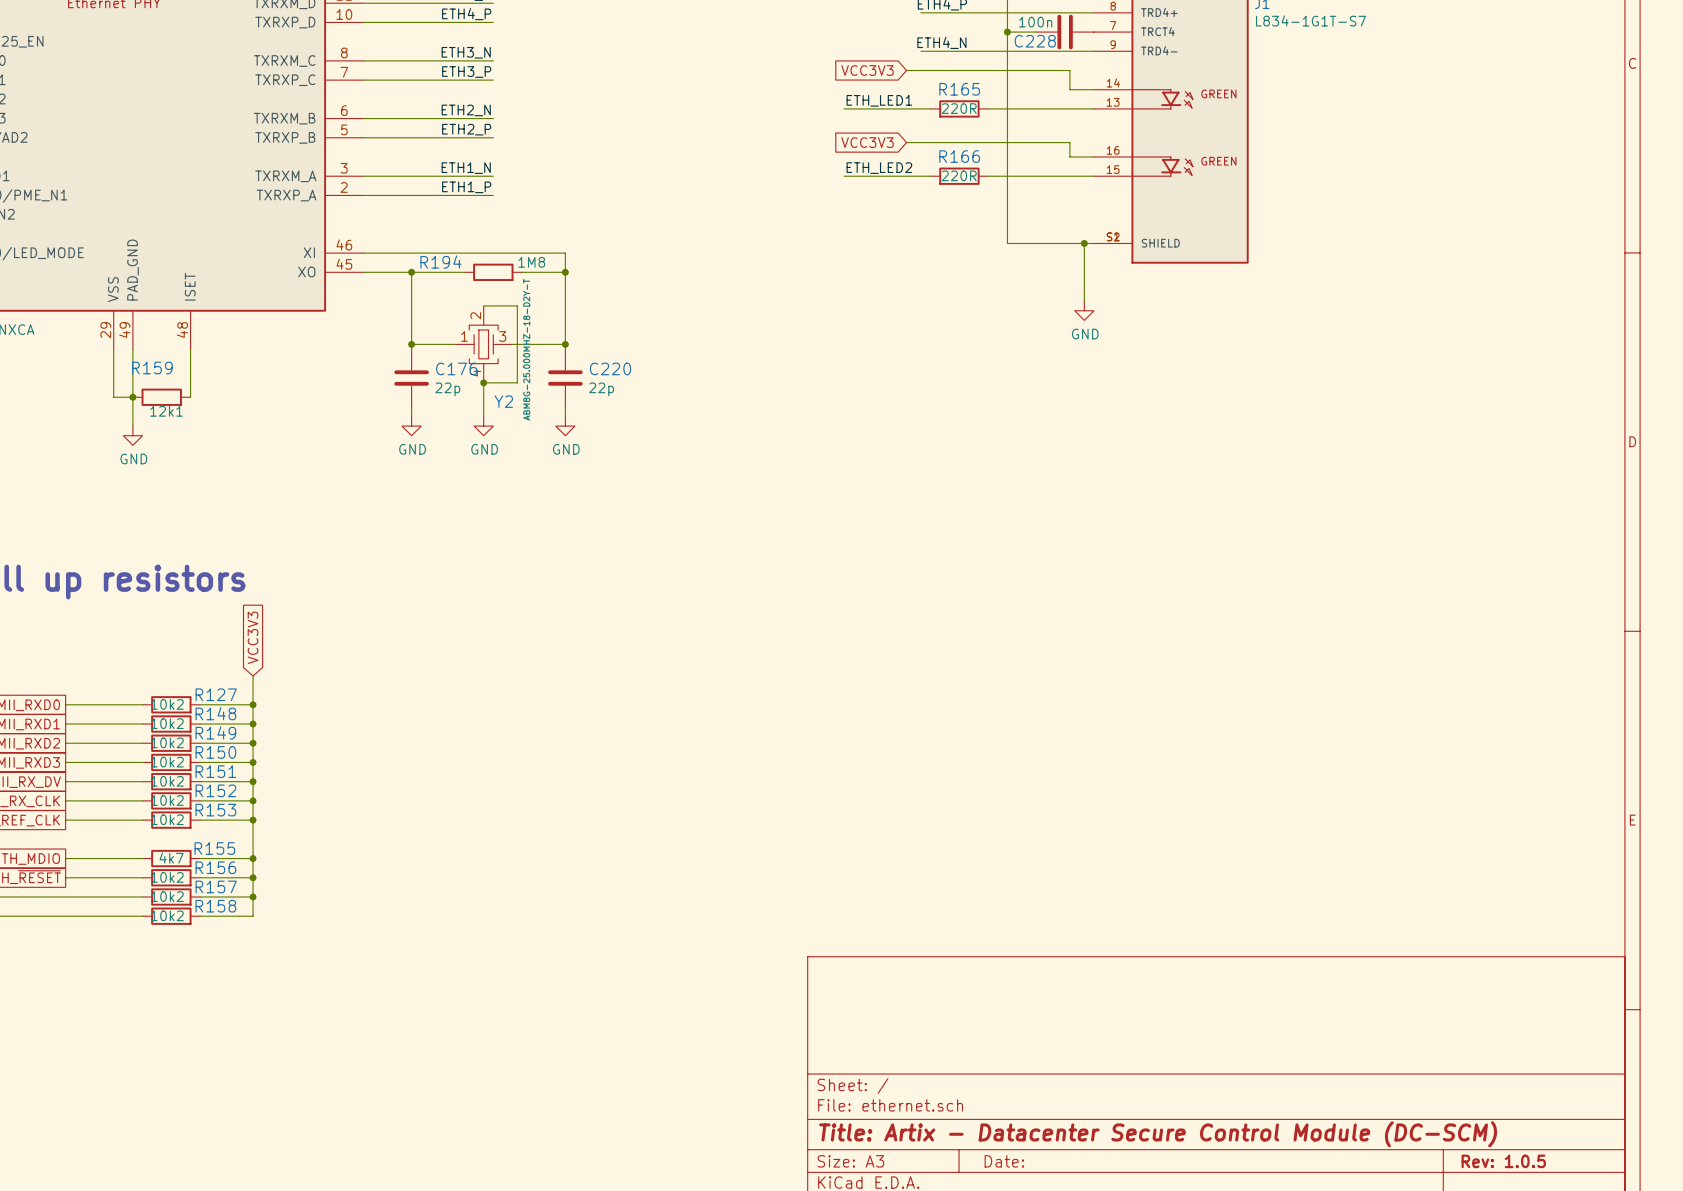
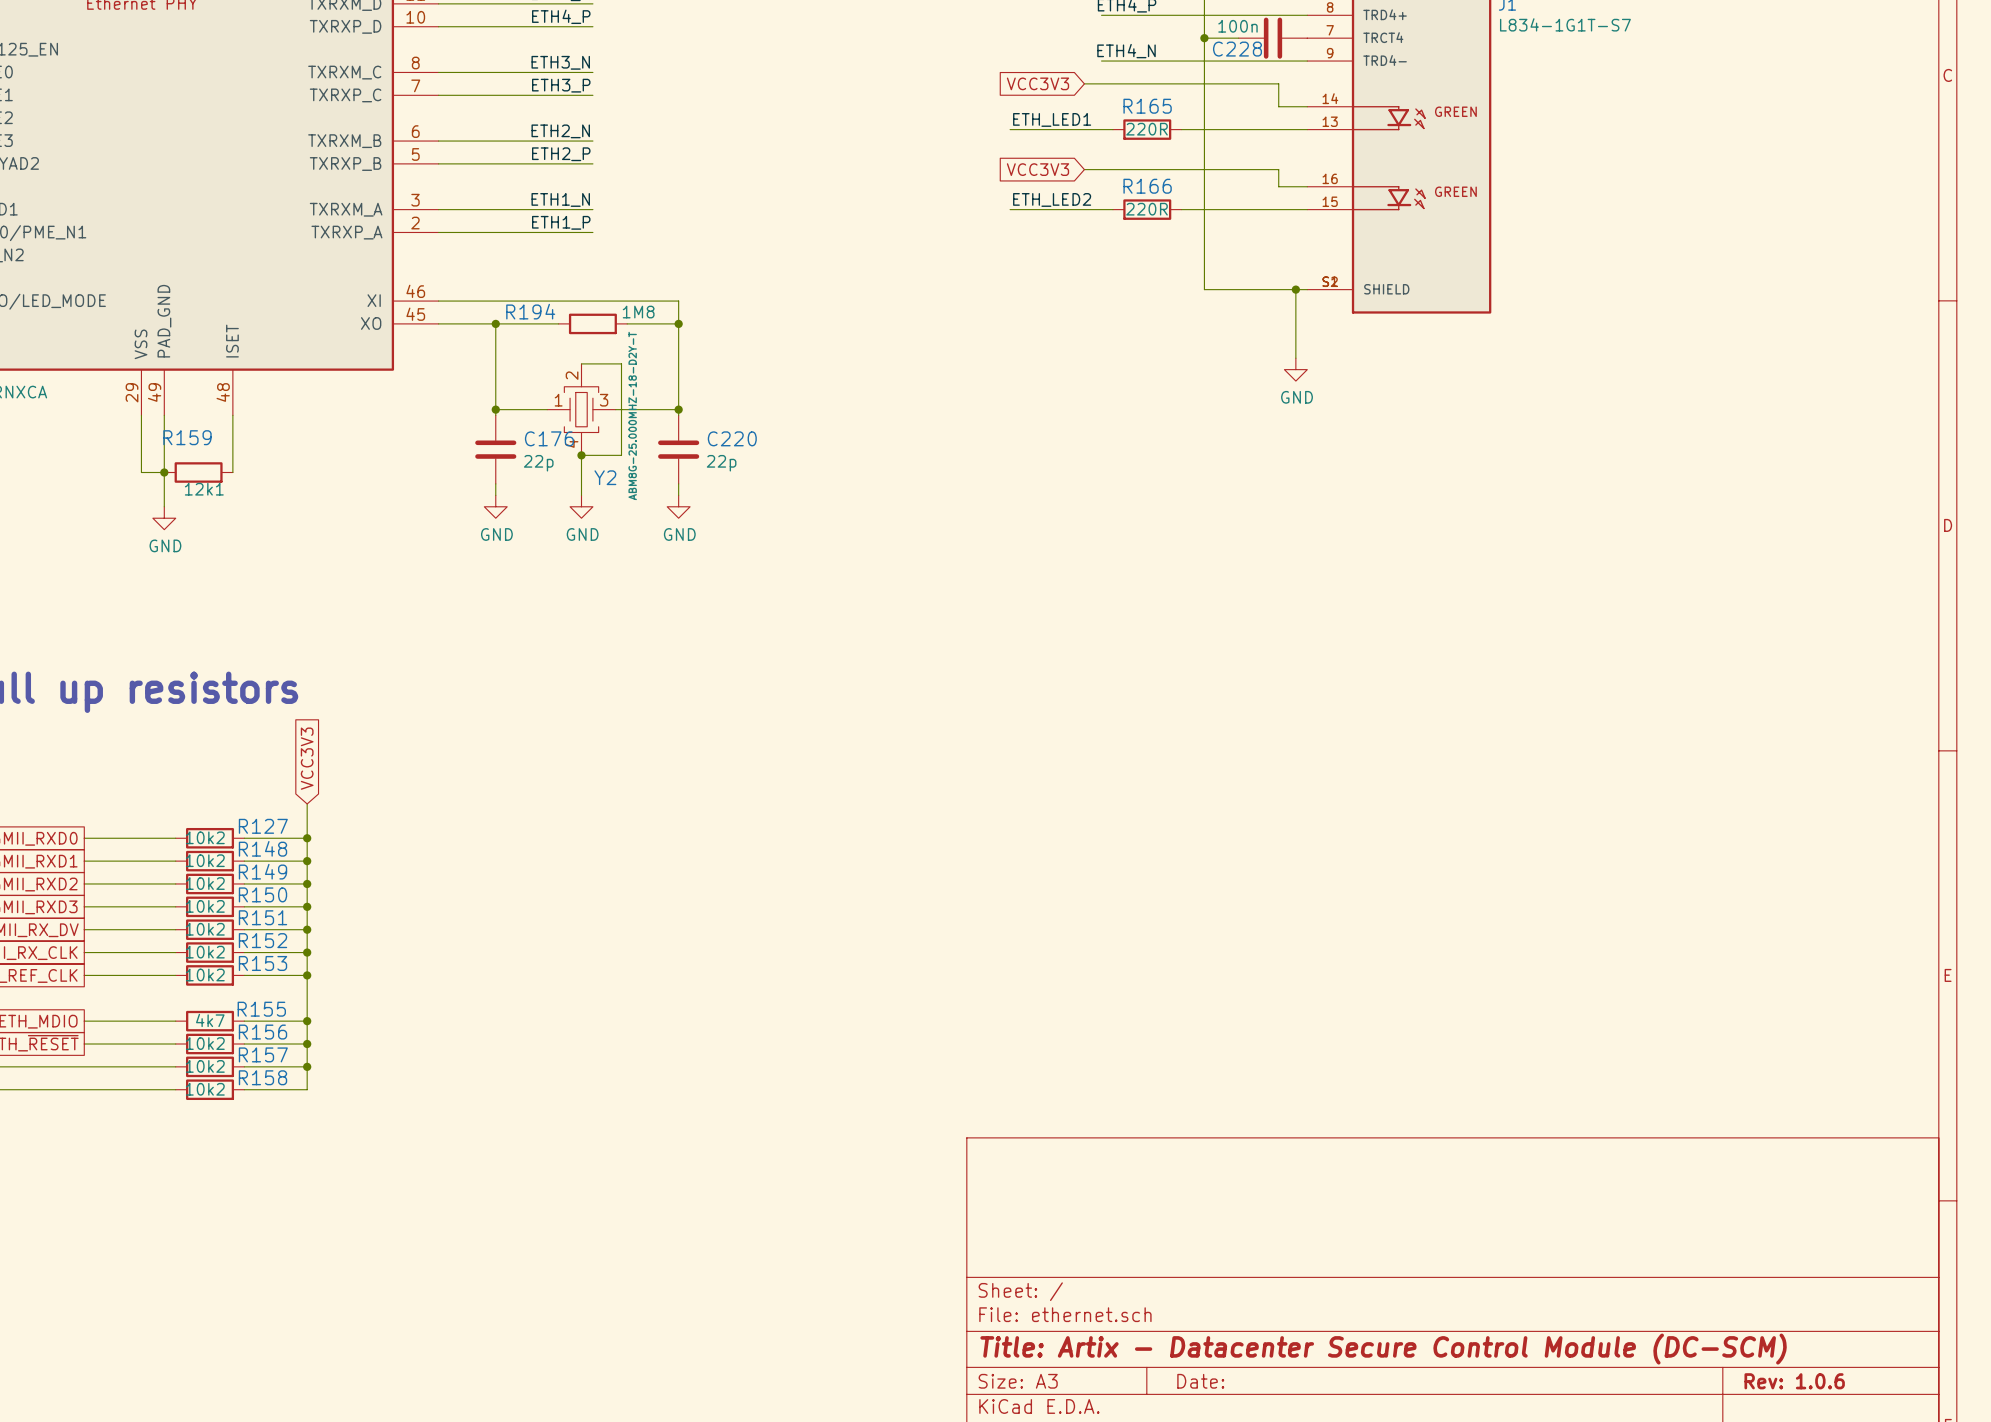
title block: Rev: 1.0.5 (1503, 1161) -> Rev: 1.0.6 (1794, 1381)

